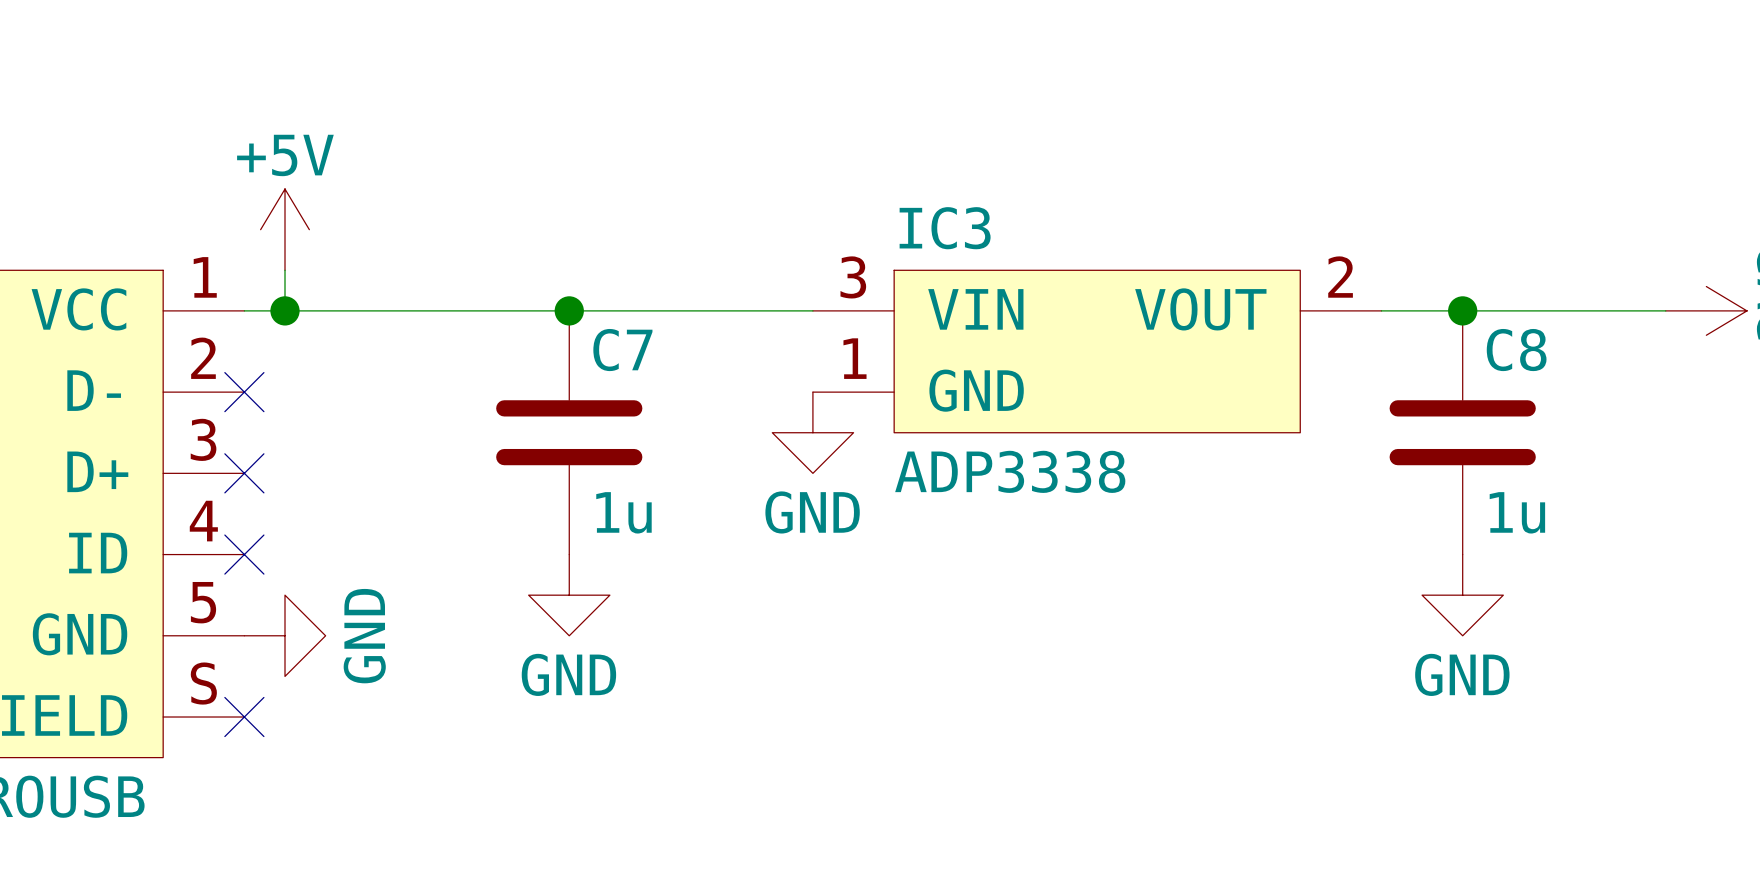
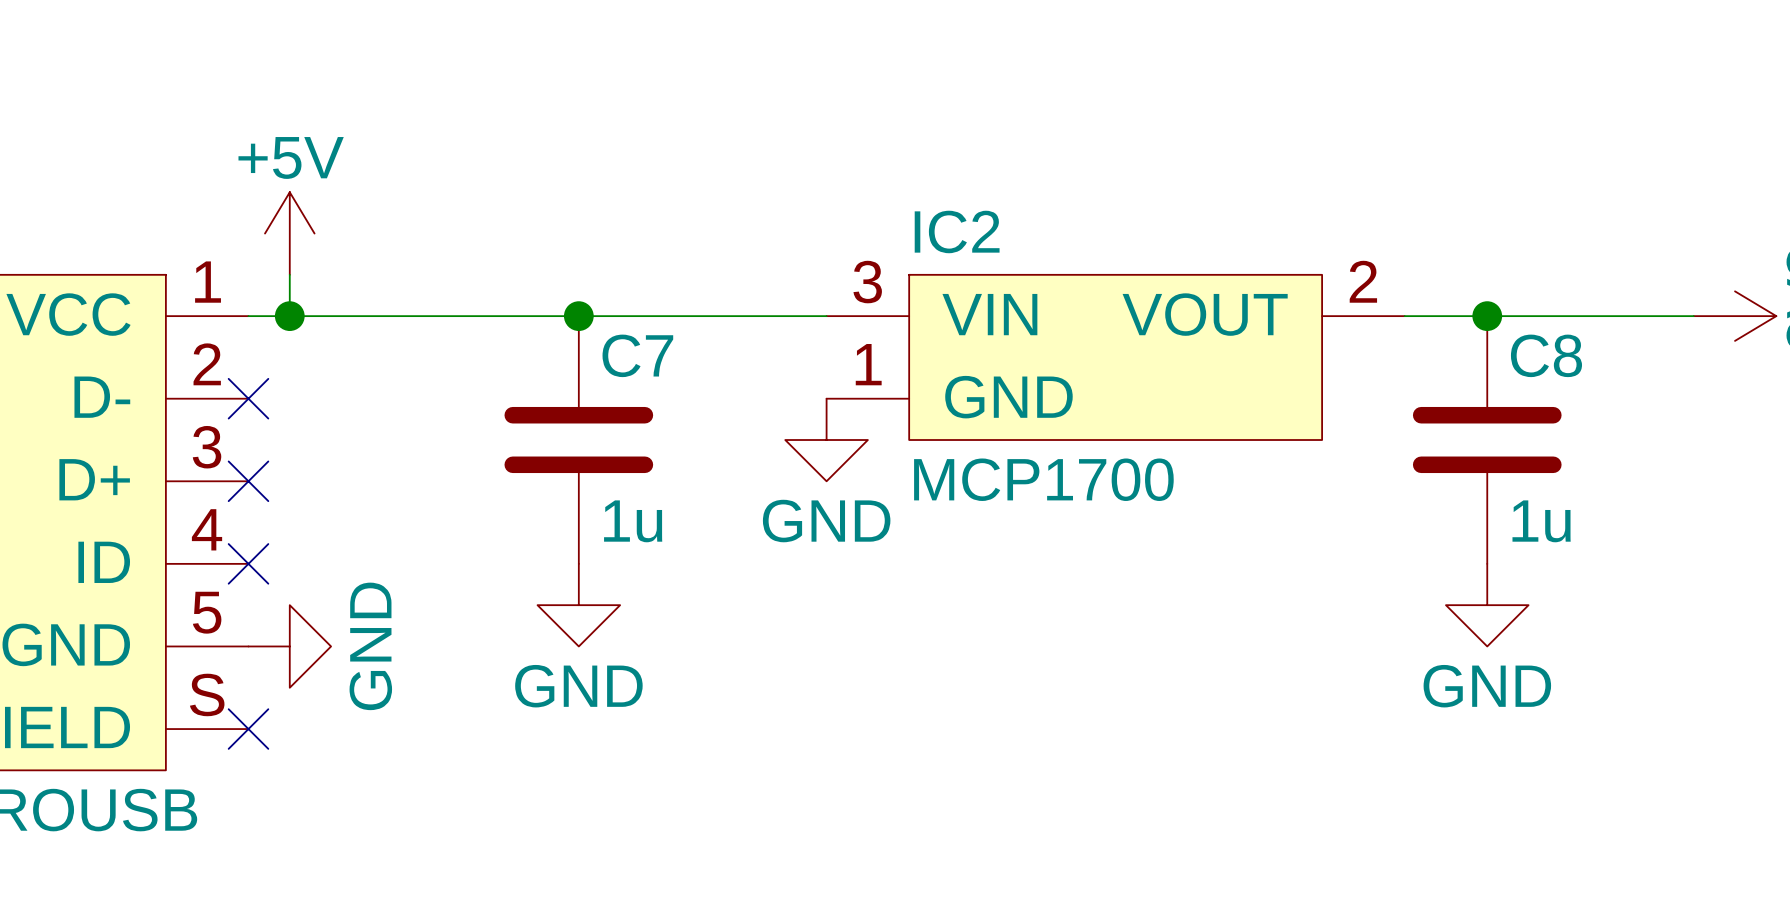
IC3 name: IC3 (945, 228) -> IC2 (957, 231)
IC3 value: ADP3338 (1010, 471) -> MCP1700 (1043, 479)

